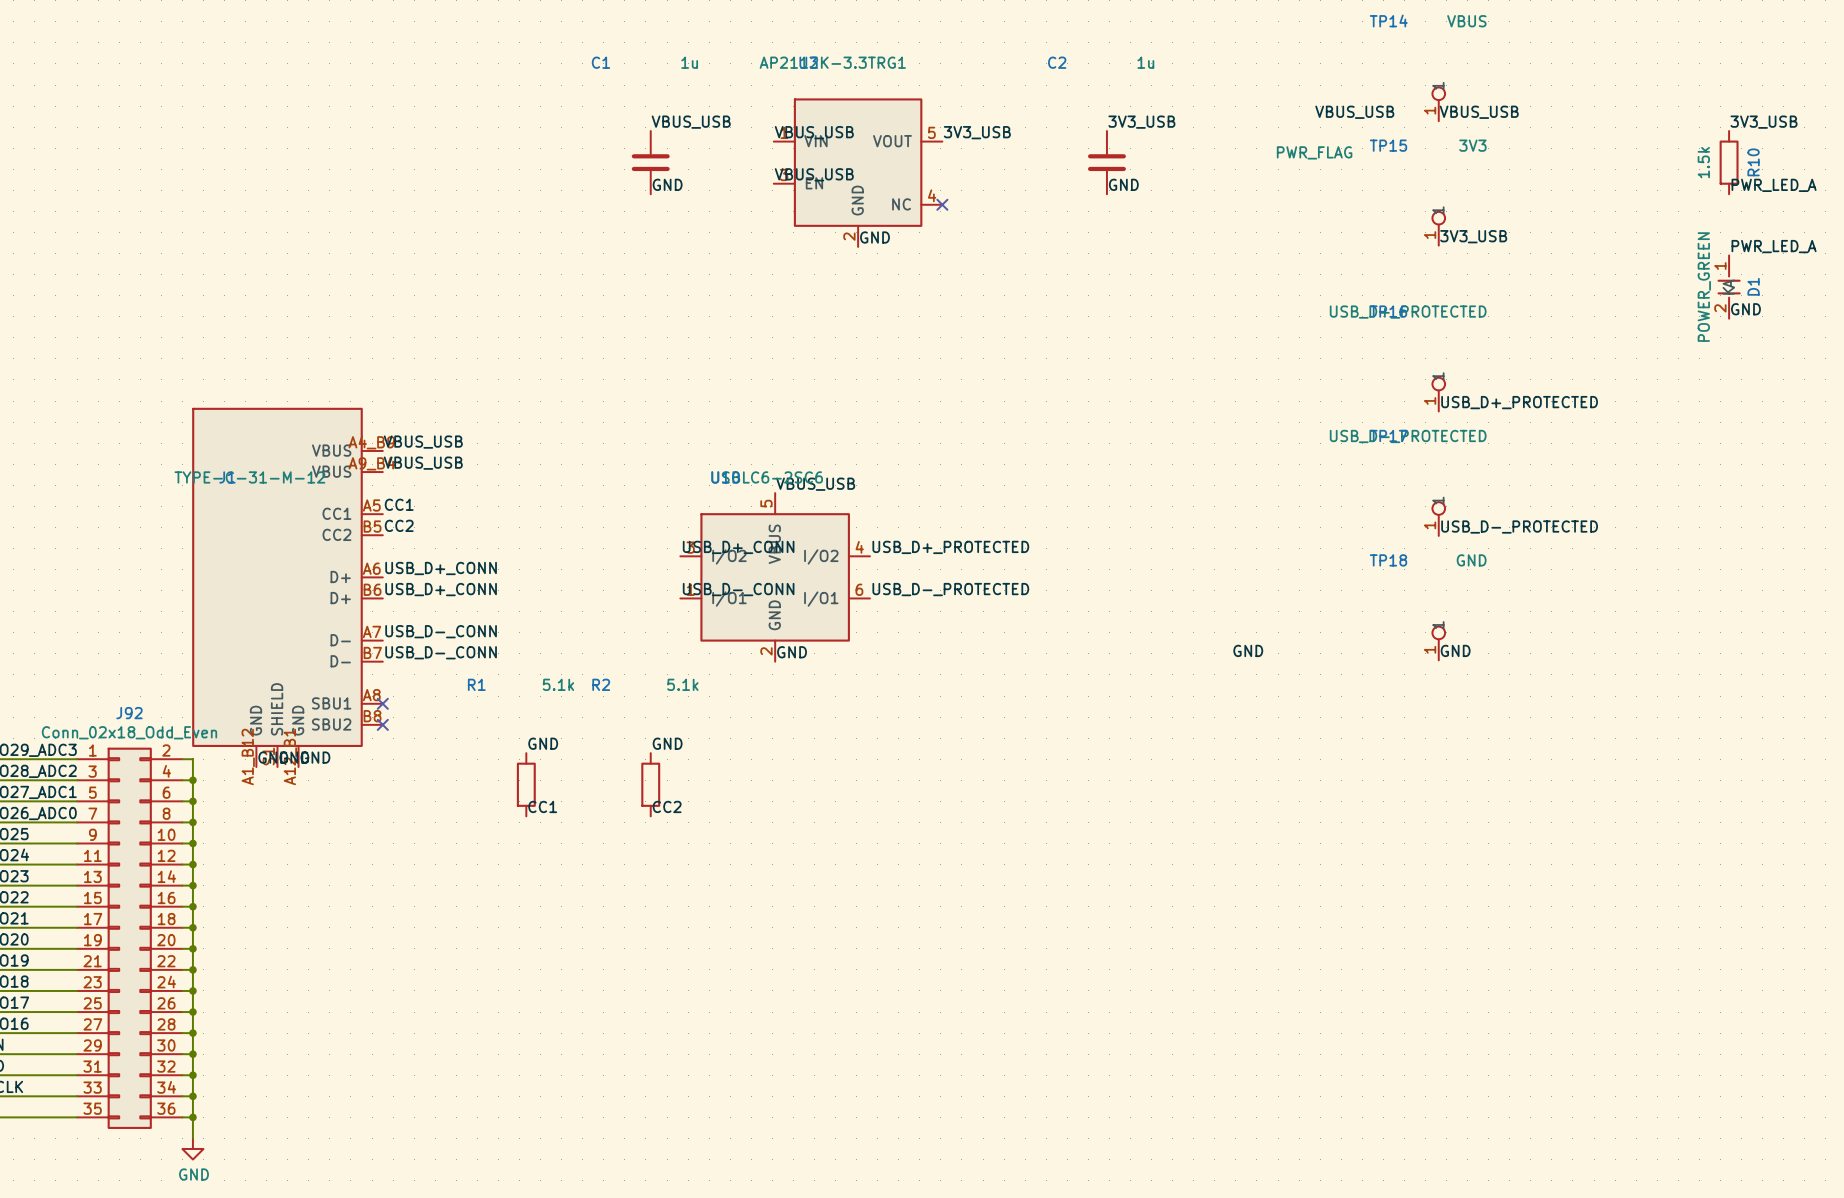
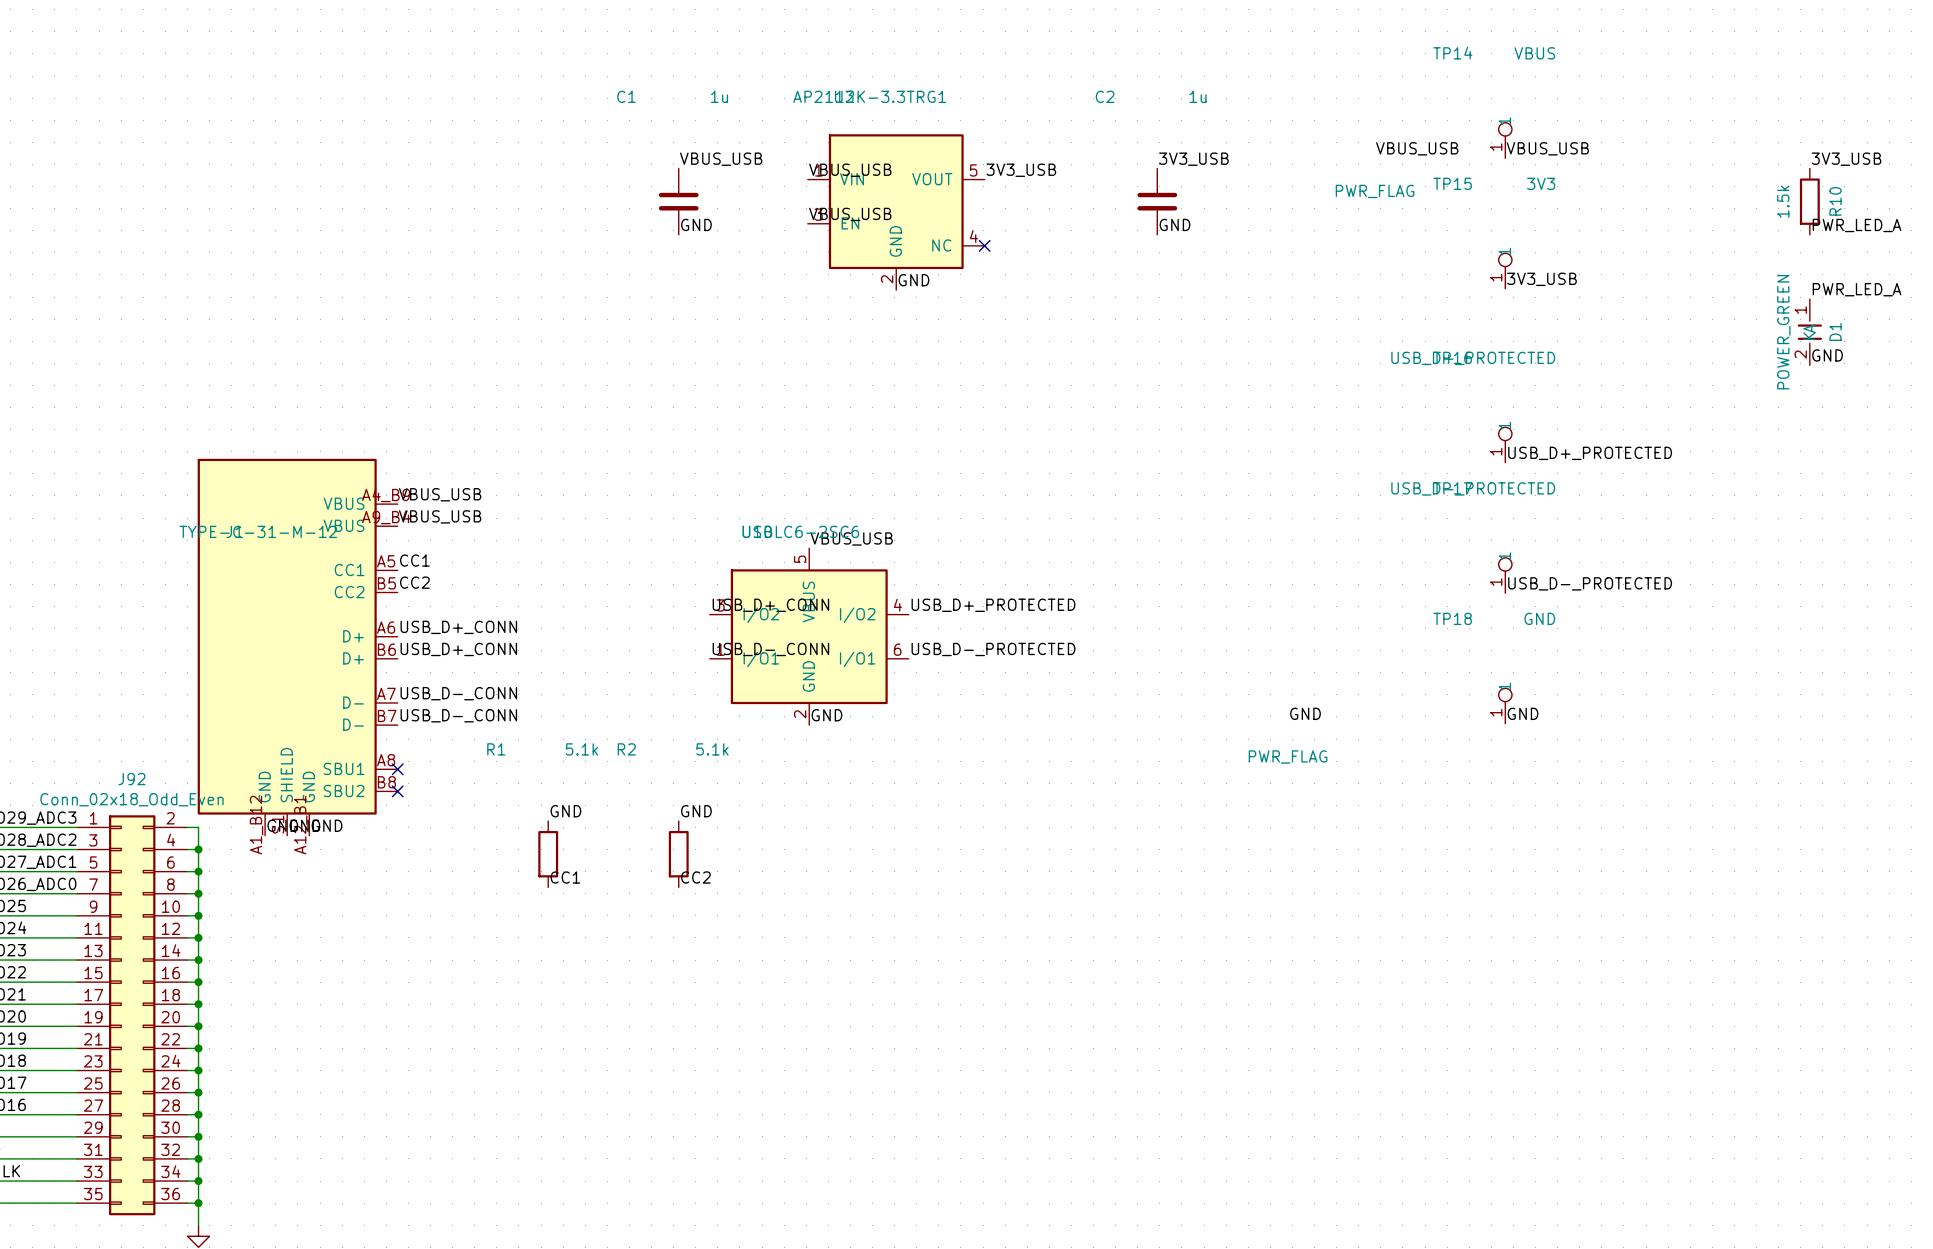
power symbol: none -> PWR_FLAG (1288, 756)

